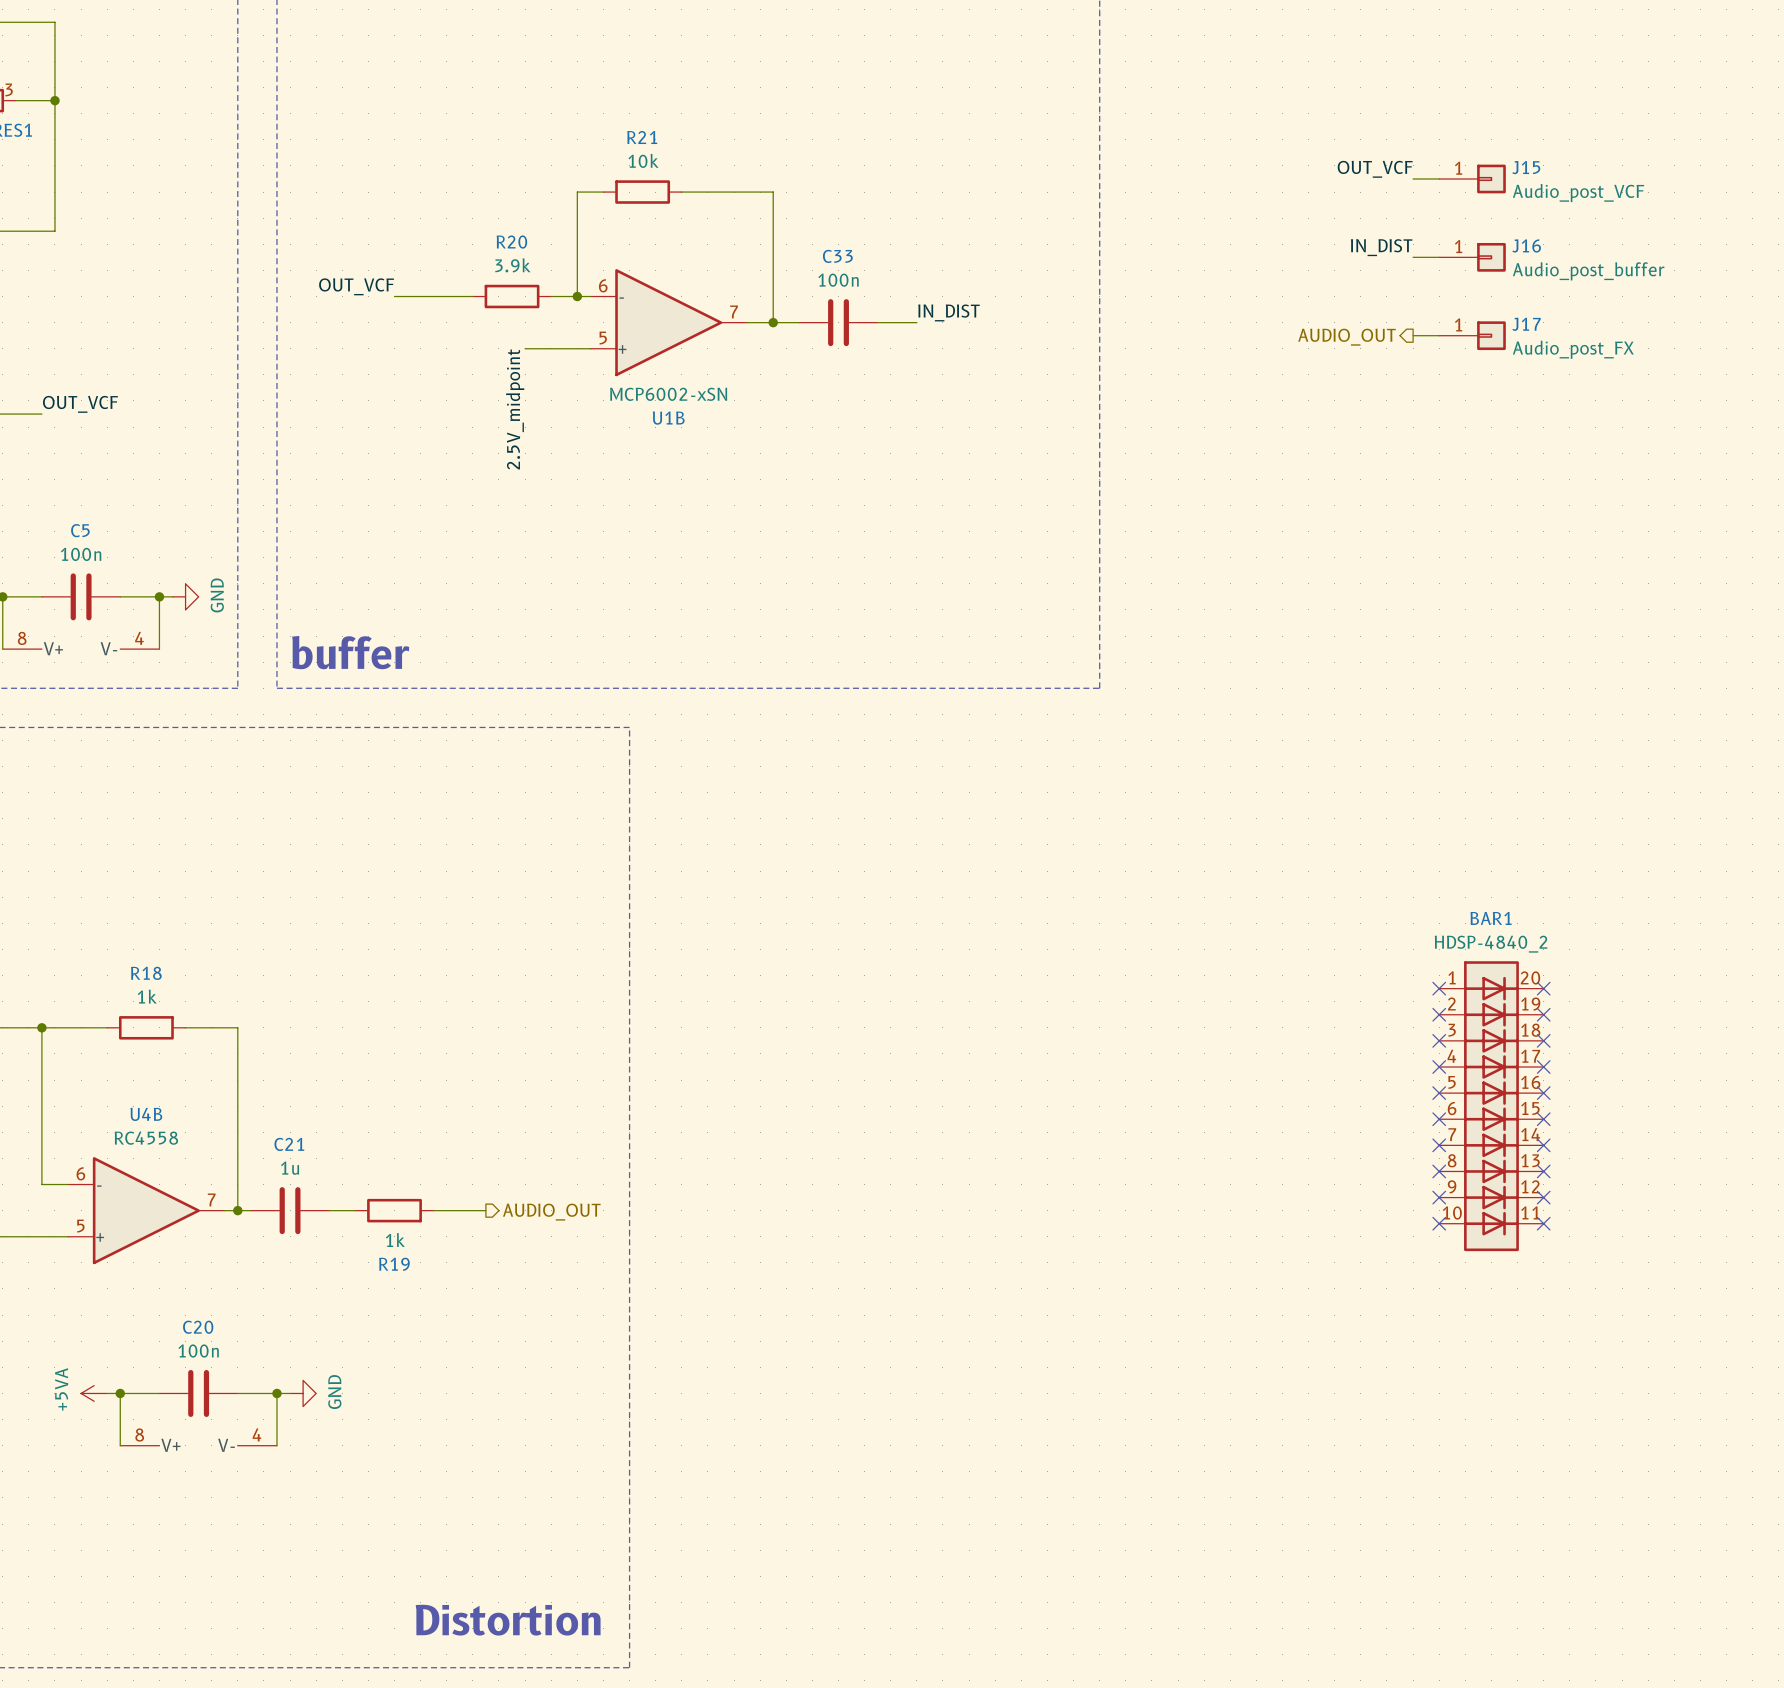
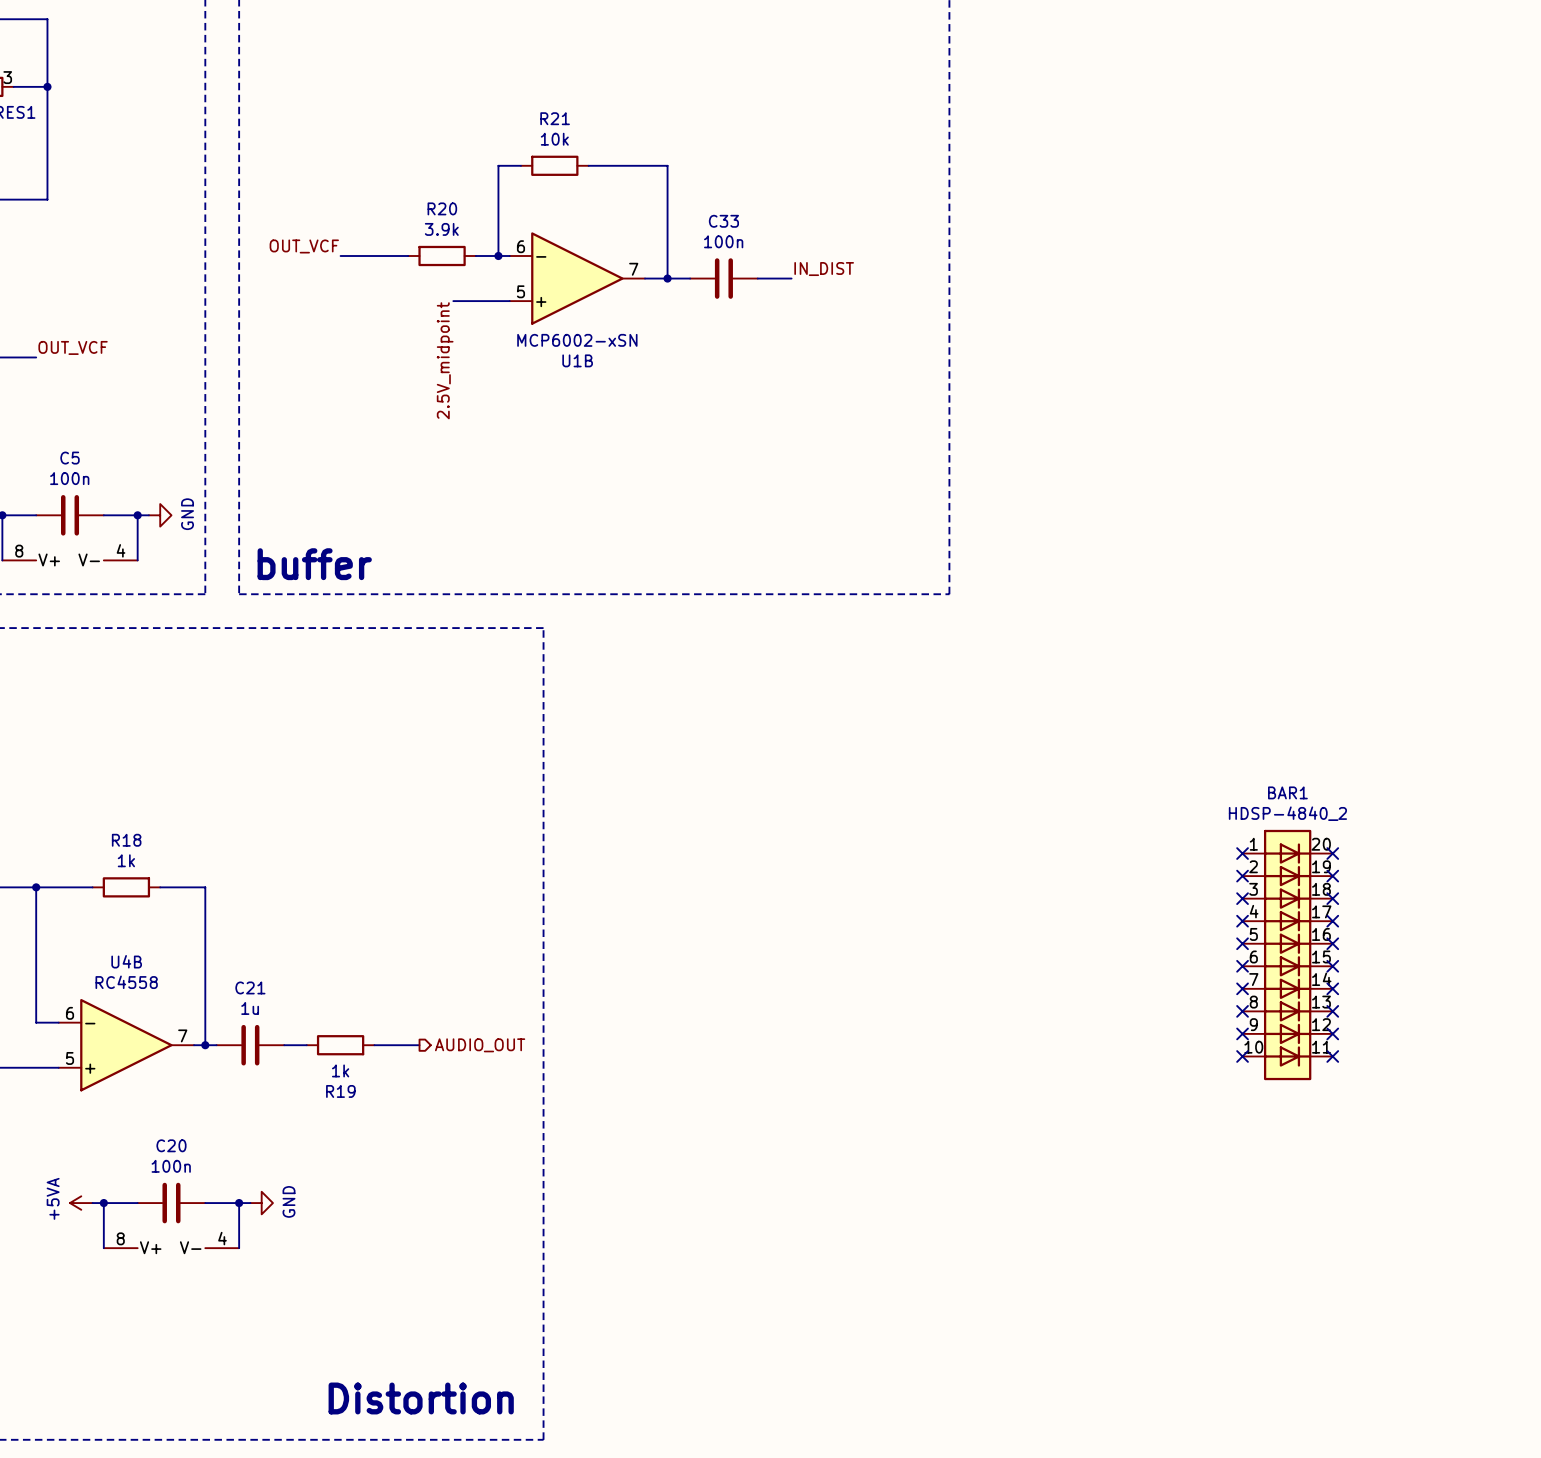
label: OUT_VCF (1375, 169) -> none
wire: (1413, 178) (1439, 178) -> none
J15: Audio_post_VCF (1472, 178) -> none
label: IN_DIST (1381, 247) -> none
wire: (1413, 257) (1439, 257) -> none
J16: Audio_post_buffer (1472, 257) -> none
wire: (1413, 335) (1439, 335) -> none
J17: Audio_post_FX (1472, 335) -> none
hierarchical label: AUDIO_OUT (1347, 337) -> none

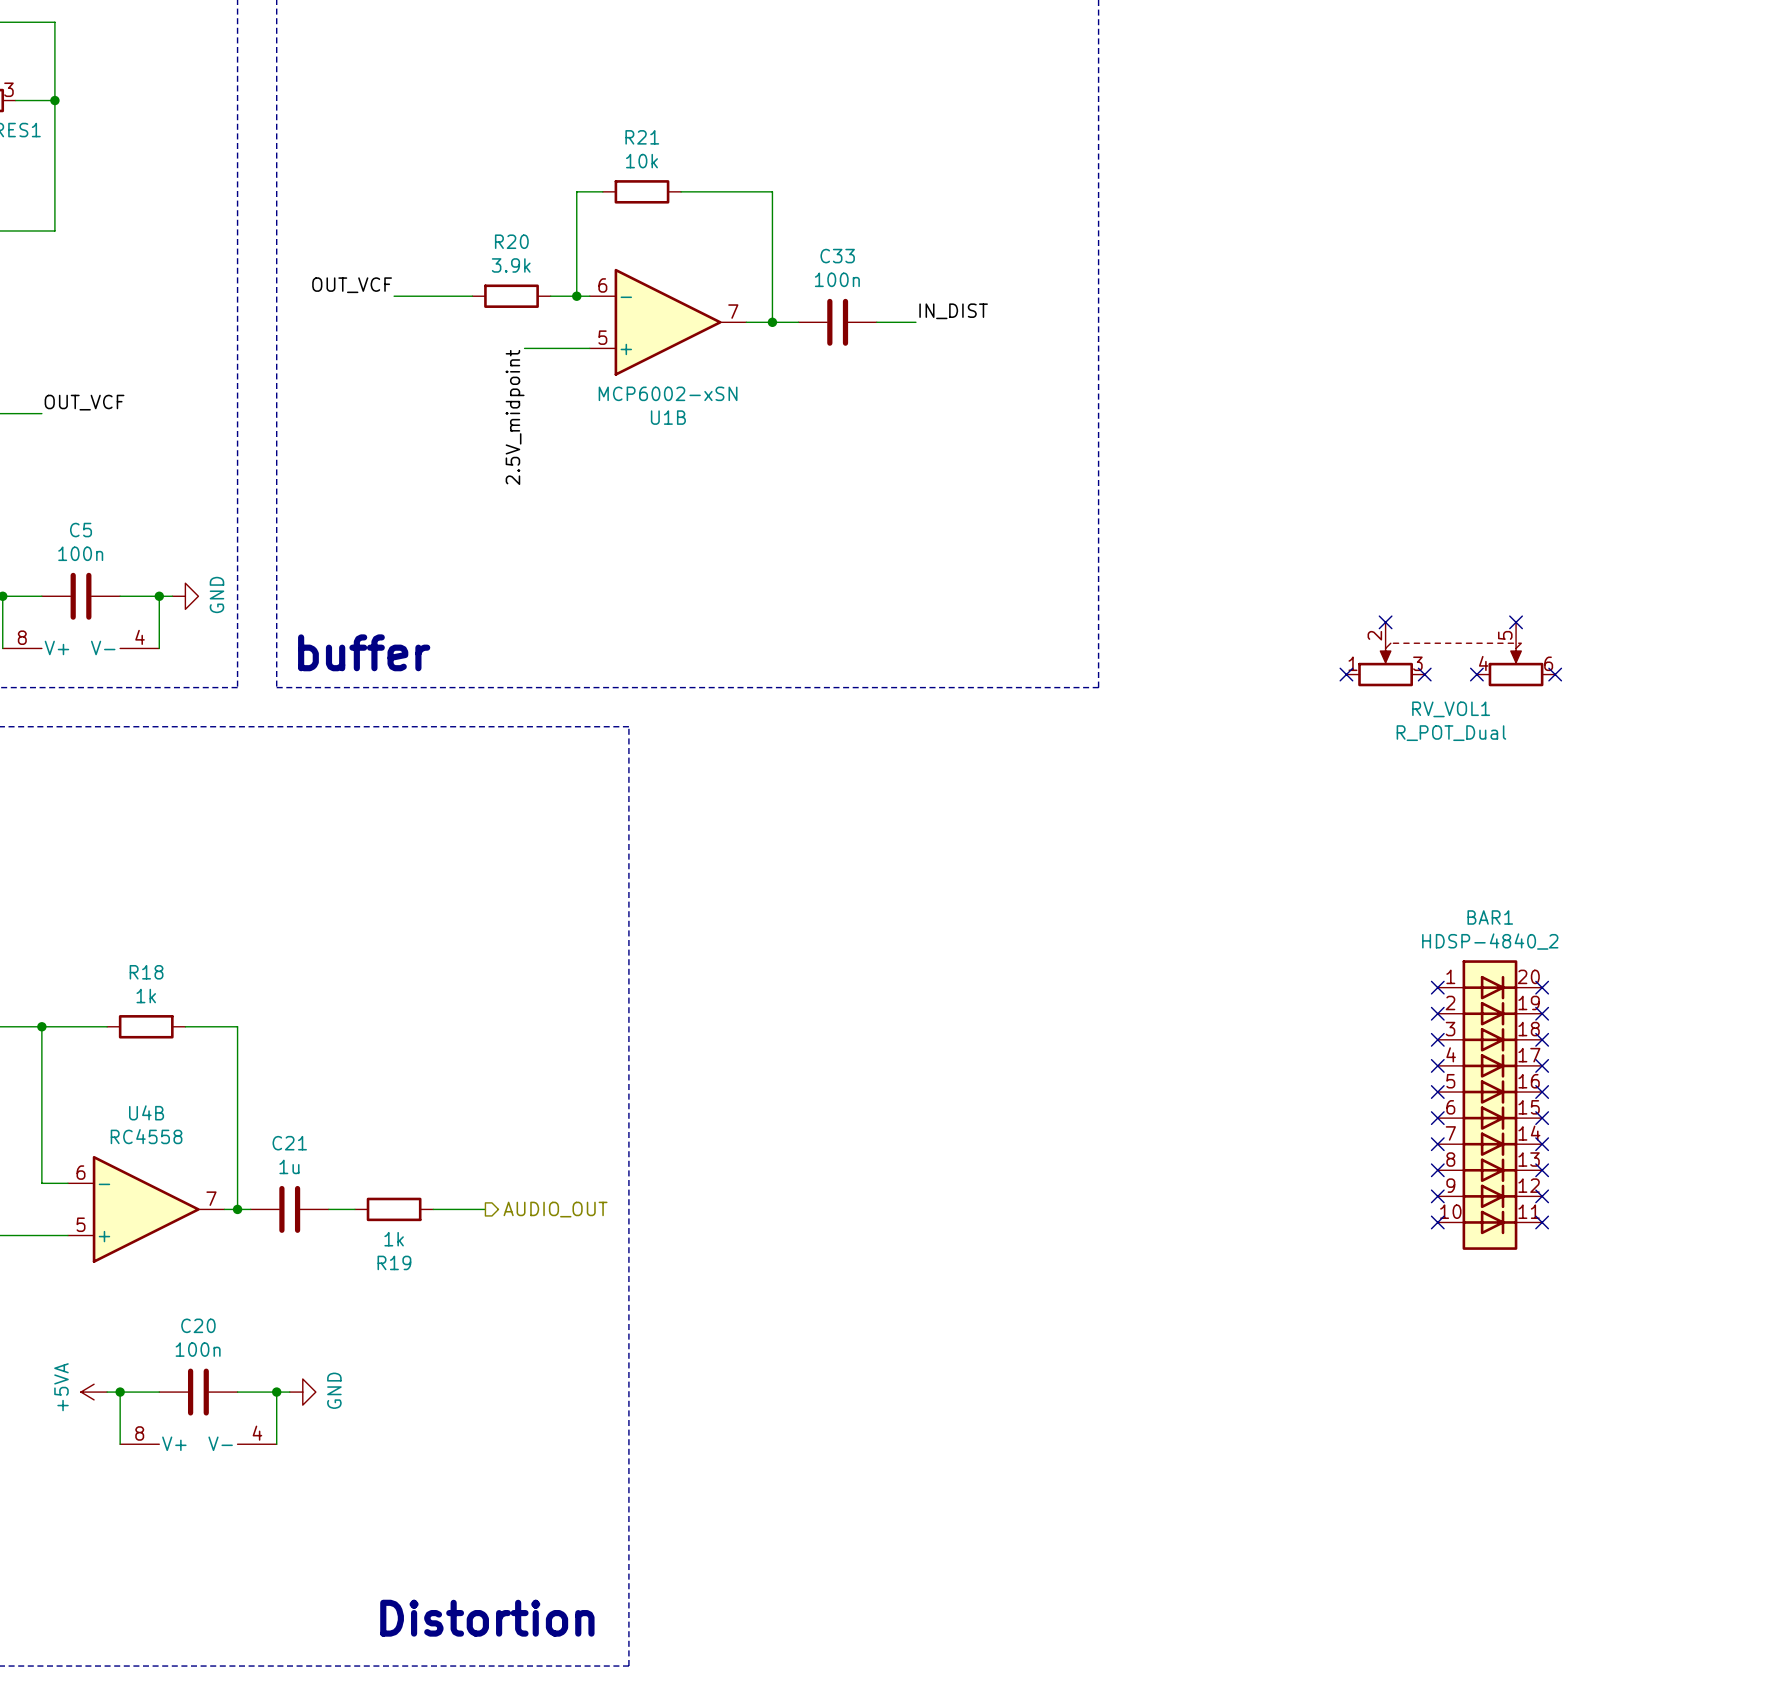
no-connect mark: none -> (1385, 622)
no-connect mark: none -> (1516, 622)
RV_VOL1: none -> R_POT_Dual (1450, 654)
no-connect mark: none -> (1346, 674)
no-connect mark: none -> (1424, 674)
no-connect mark: none -> (1476, 674)
no-connect mark: none -> (1555, 674)

